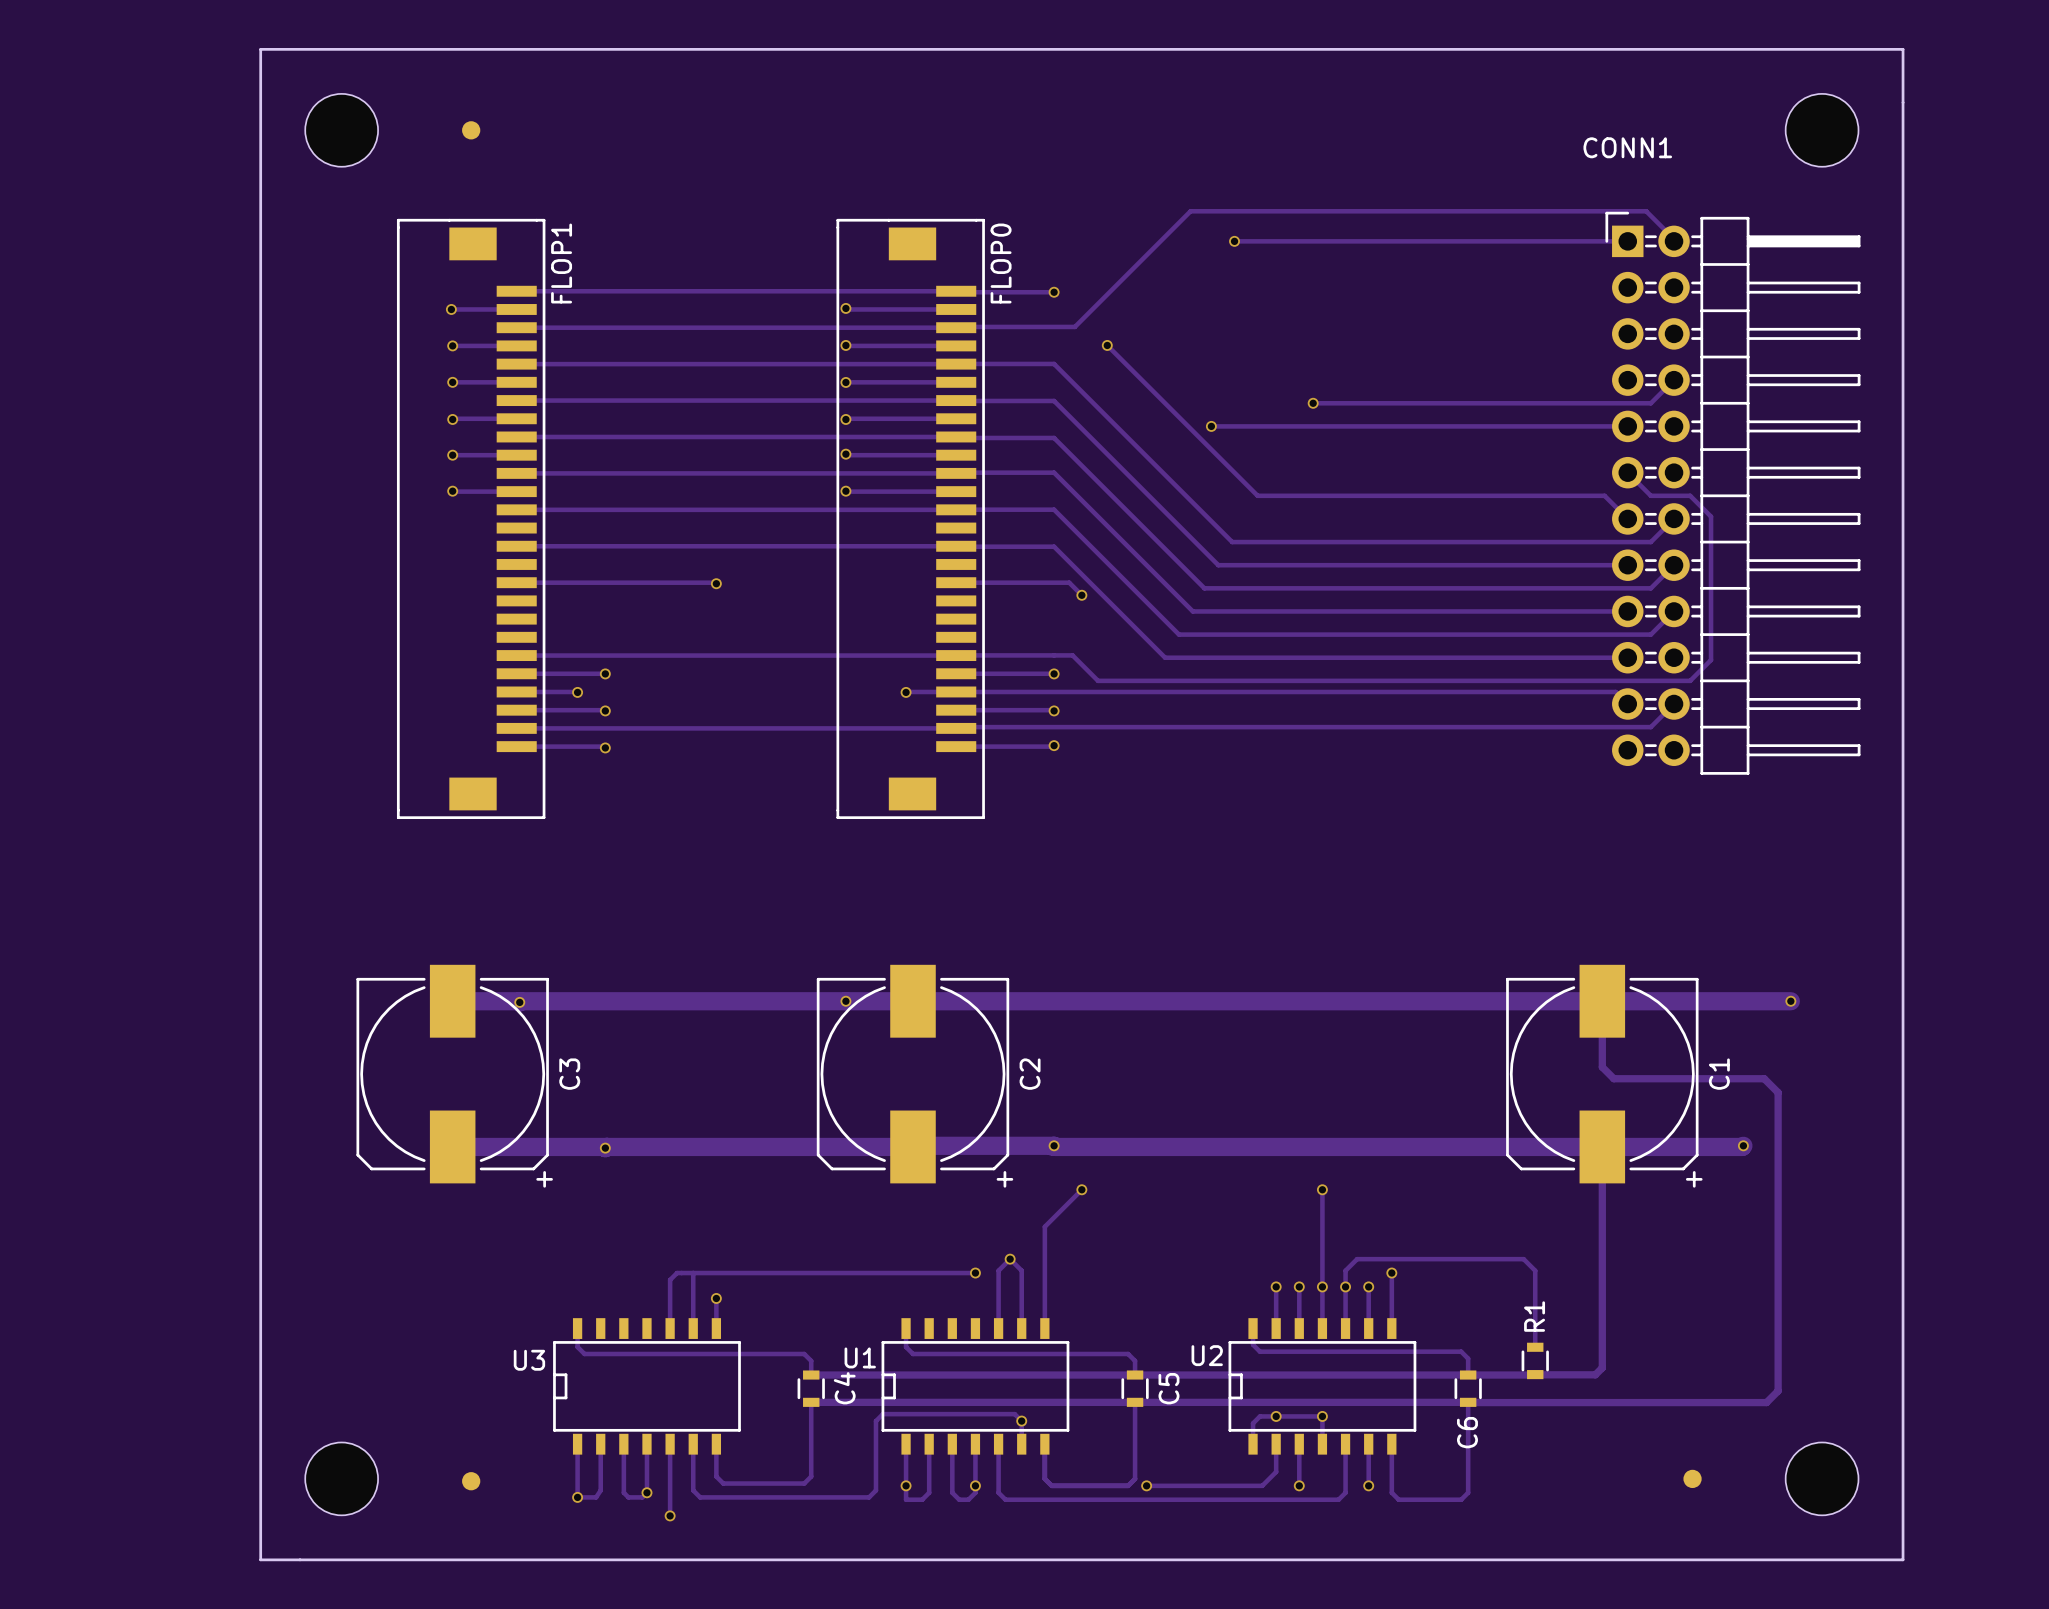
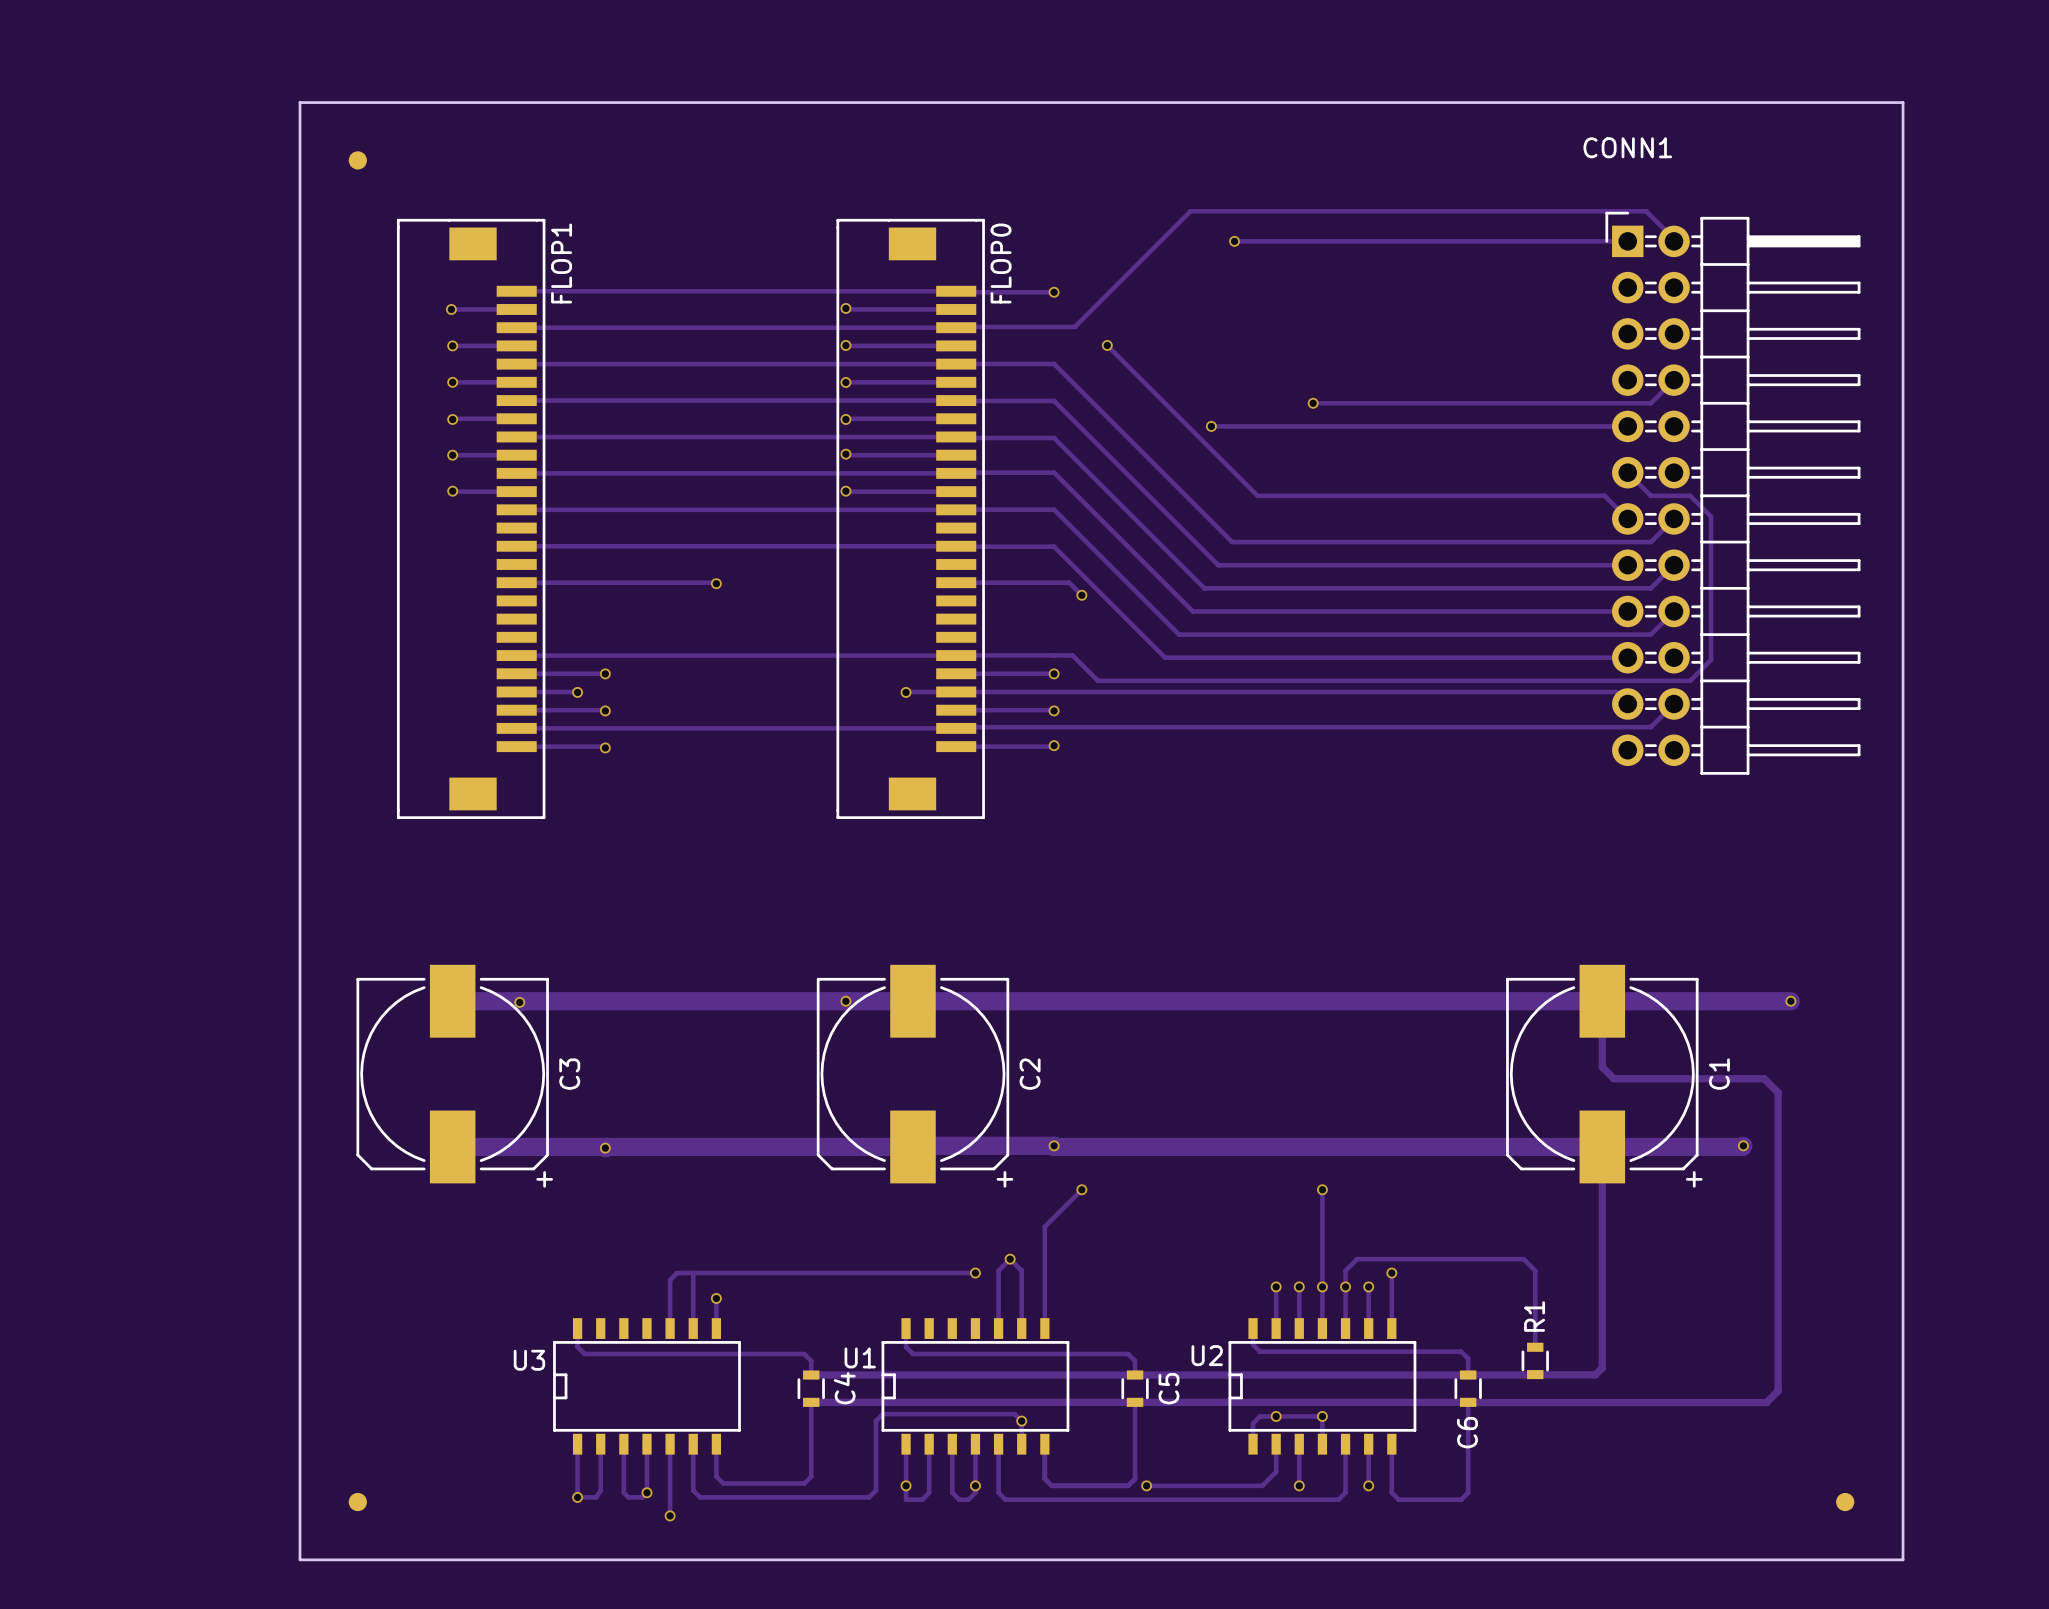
board edge: (1903, 102) (1903, 49) (260, 49) (260, 1559) (300, 1559) -> (1903, 102) (300, 102) (300, 1559)
part: (341, 130) -> none
part position: (471, 130) -> (357, 160)
part: (1822, 130) -> none
part: (341, 1478) -> none
part position: (1692, 1478) -> (1845, 1502)
part: (1822, 1478) -> none
part position: (471, 1481) -> (357, 1502)

